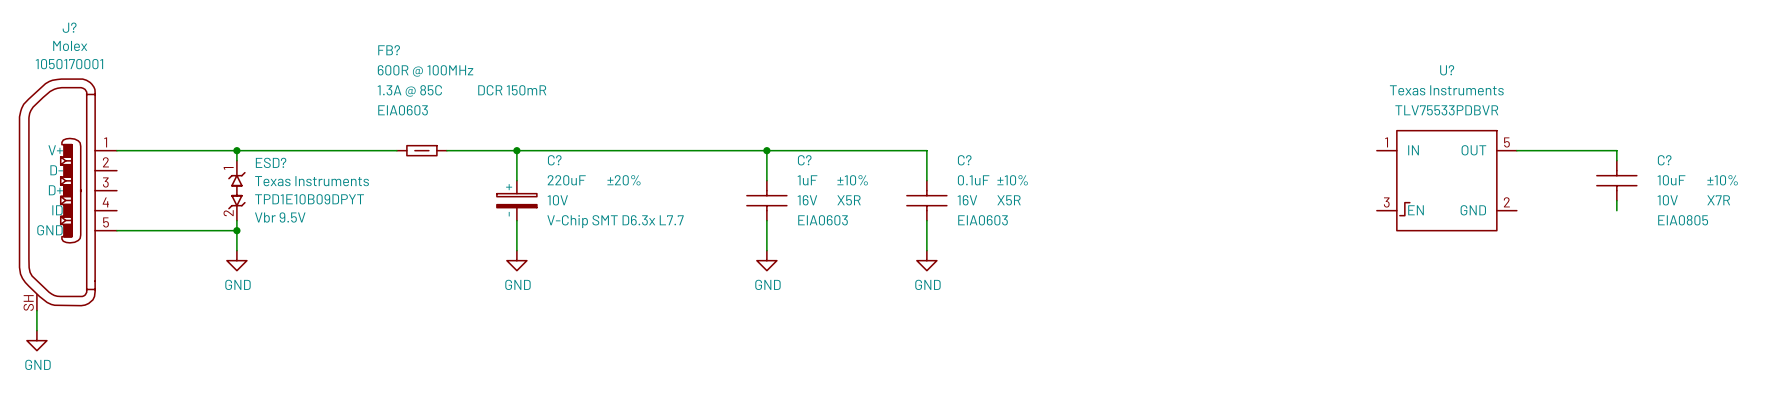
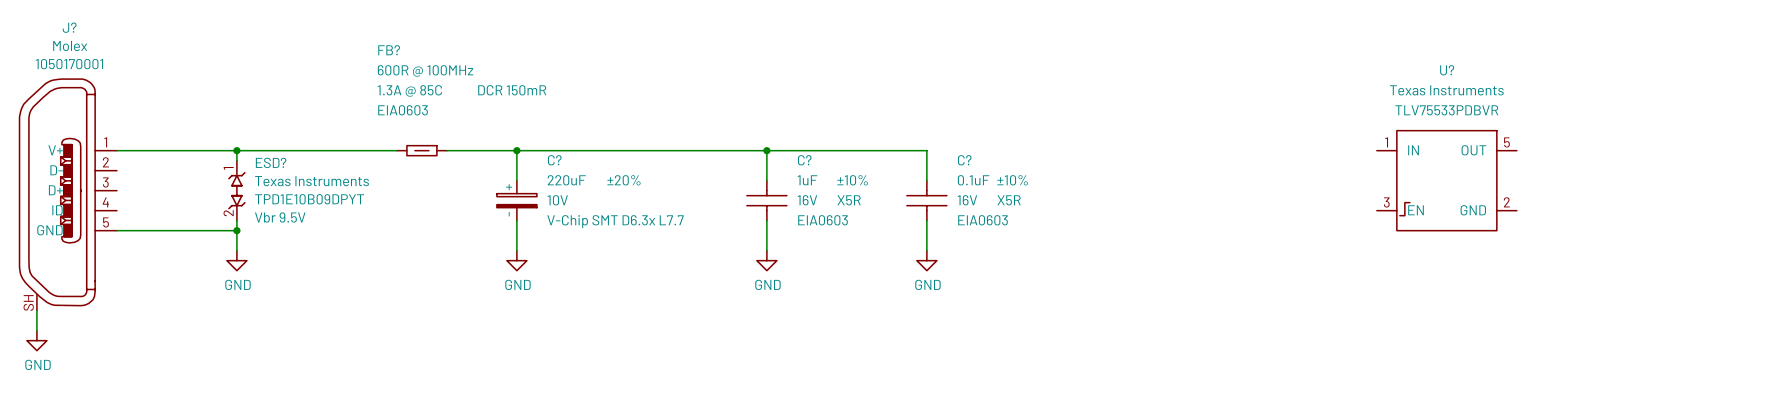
wire: (1516, 150) (1616, 150) (1616, 160) -> none
C?: (1616, 180) -> none
wire: (1616, 200) (1616, 210) -> none

